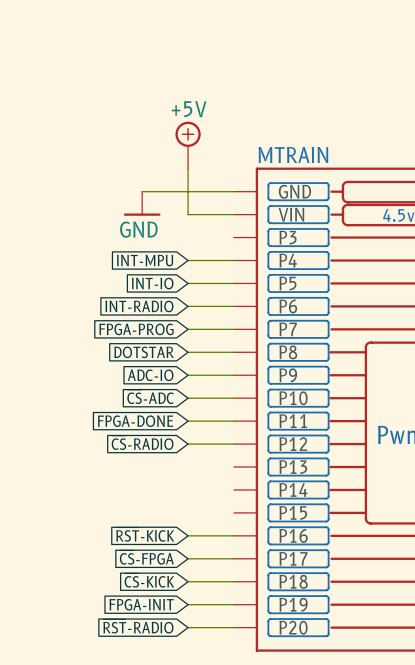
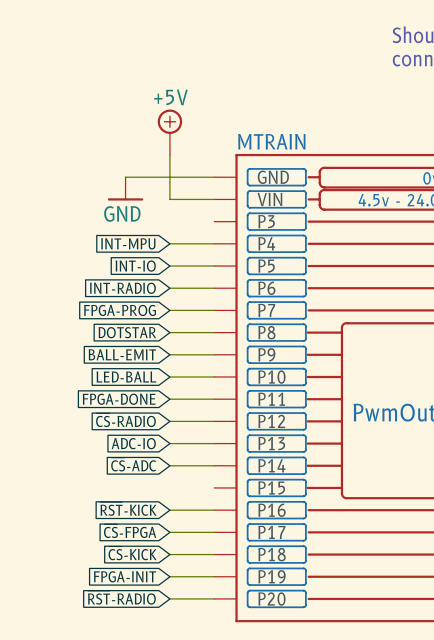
global label: ADC-IO (150, 375) -> BALL-EMIT (122, 354)
global label: ~{CS}-ADC (150, 396) -> LED-BALL (126, 376)
global label: none -> ADC-IO (133, 443)
wire: none -> (169, 443) (214, 443)
global label: none -> ~{CS}-ADC (133, 464)
wire: none -> (169, 465) (214, 465)

